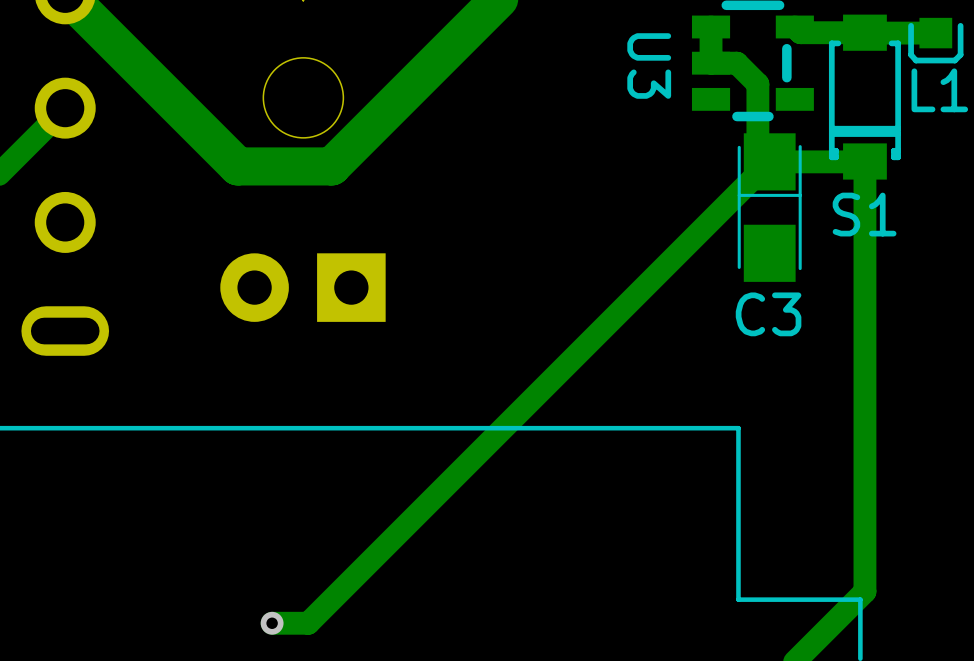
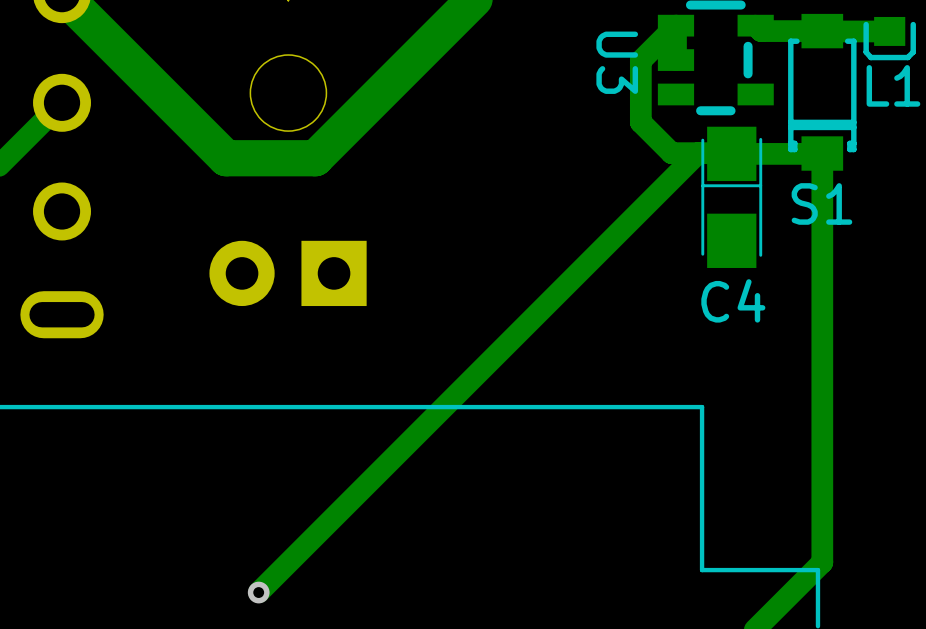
track: none -> (675, 25) (640, 60) (640, 122) (671, 153) (728, 153)
track: (711, 63) (736, 63) (757, 84) (757, 150) (769, 161) (308, 623) (272, 623) -> (698, 153) (259, 592)
C3 name: C3 (768, 314) -> C4 (733, 300)

